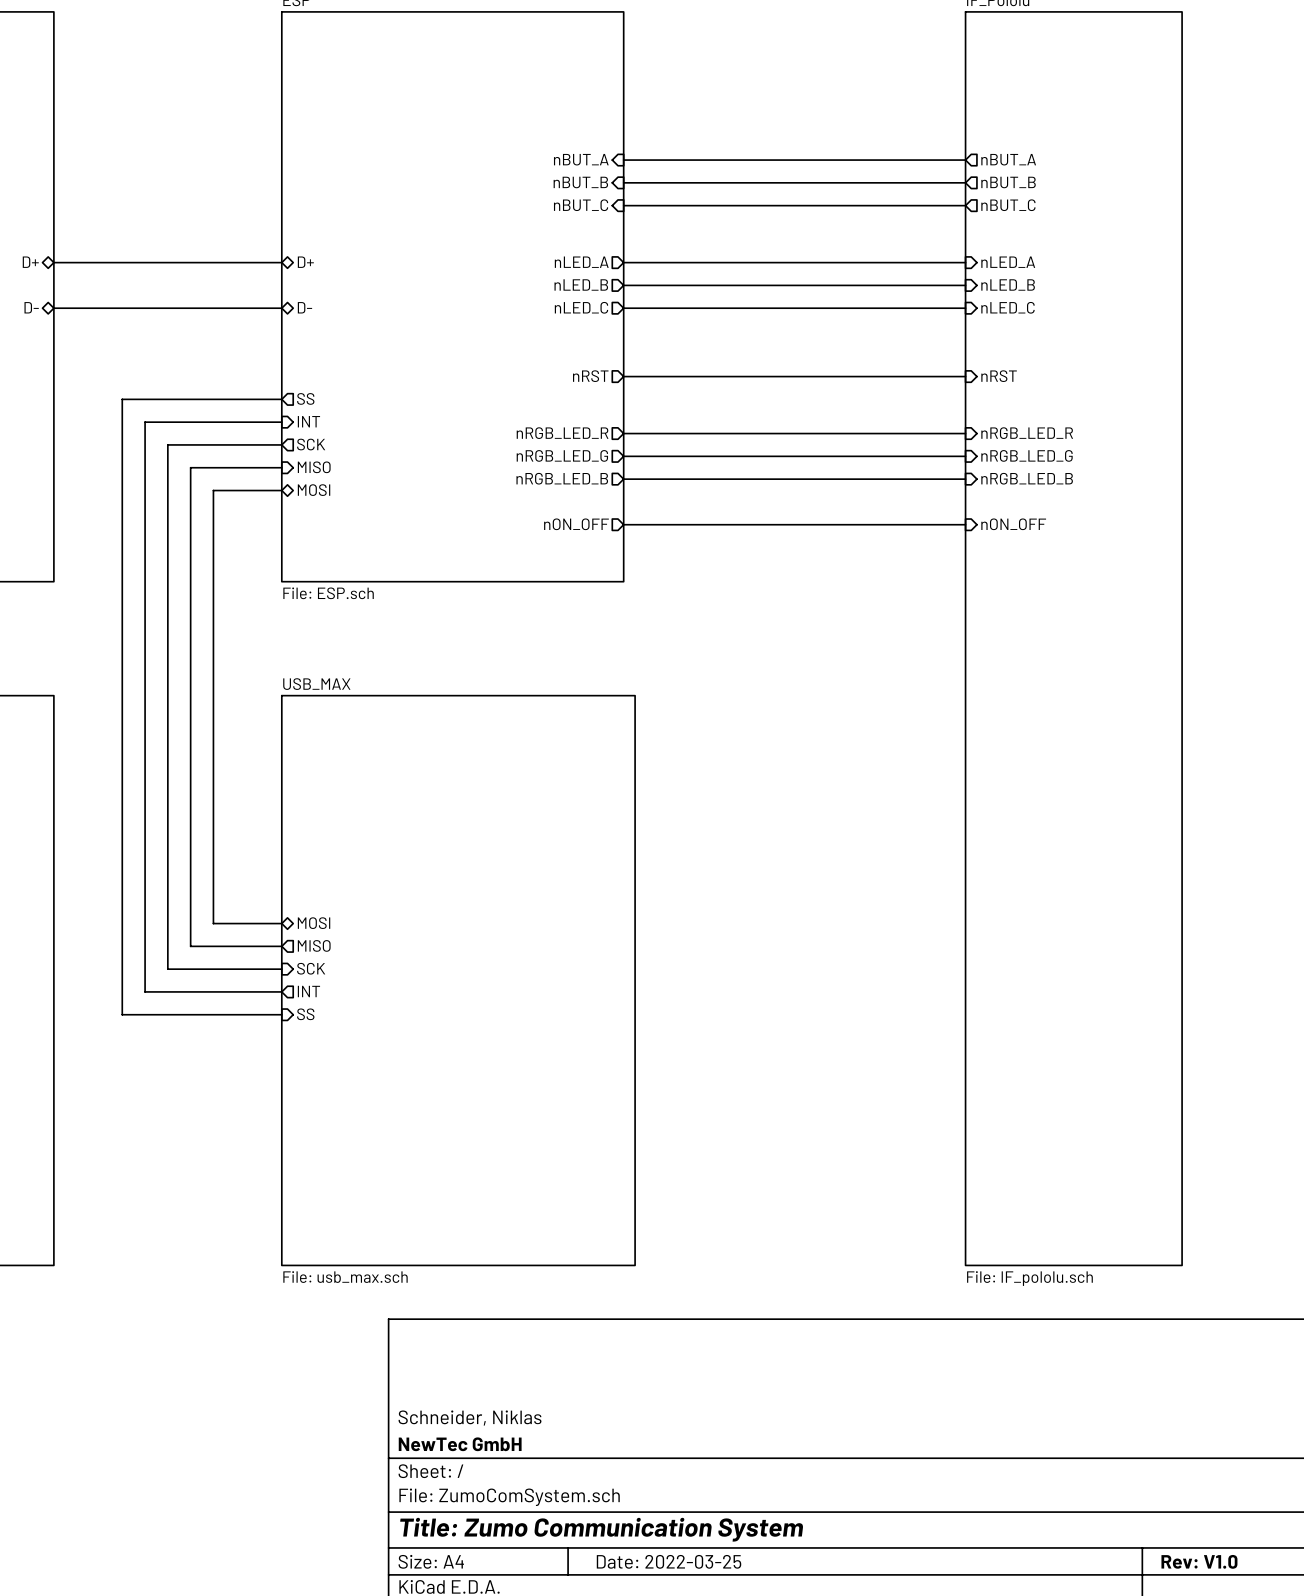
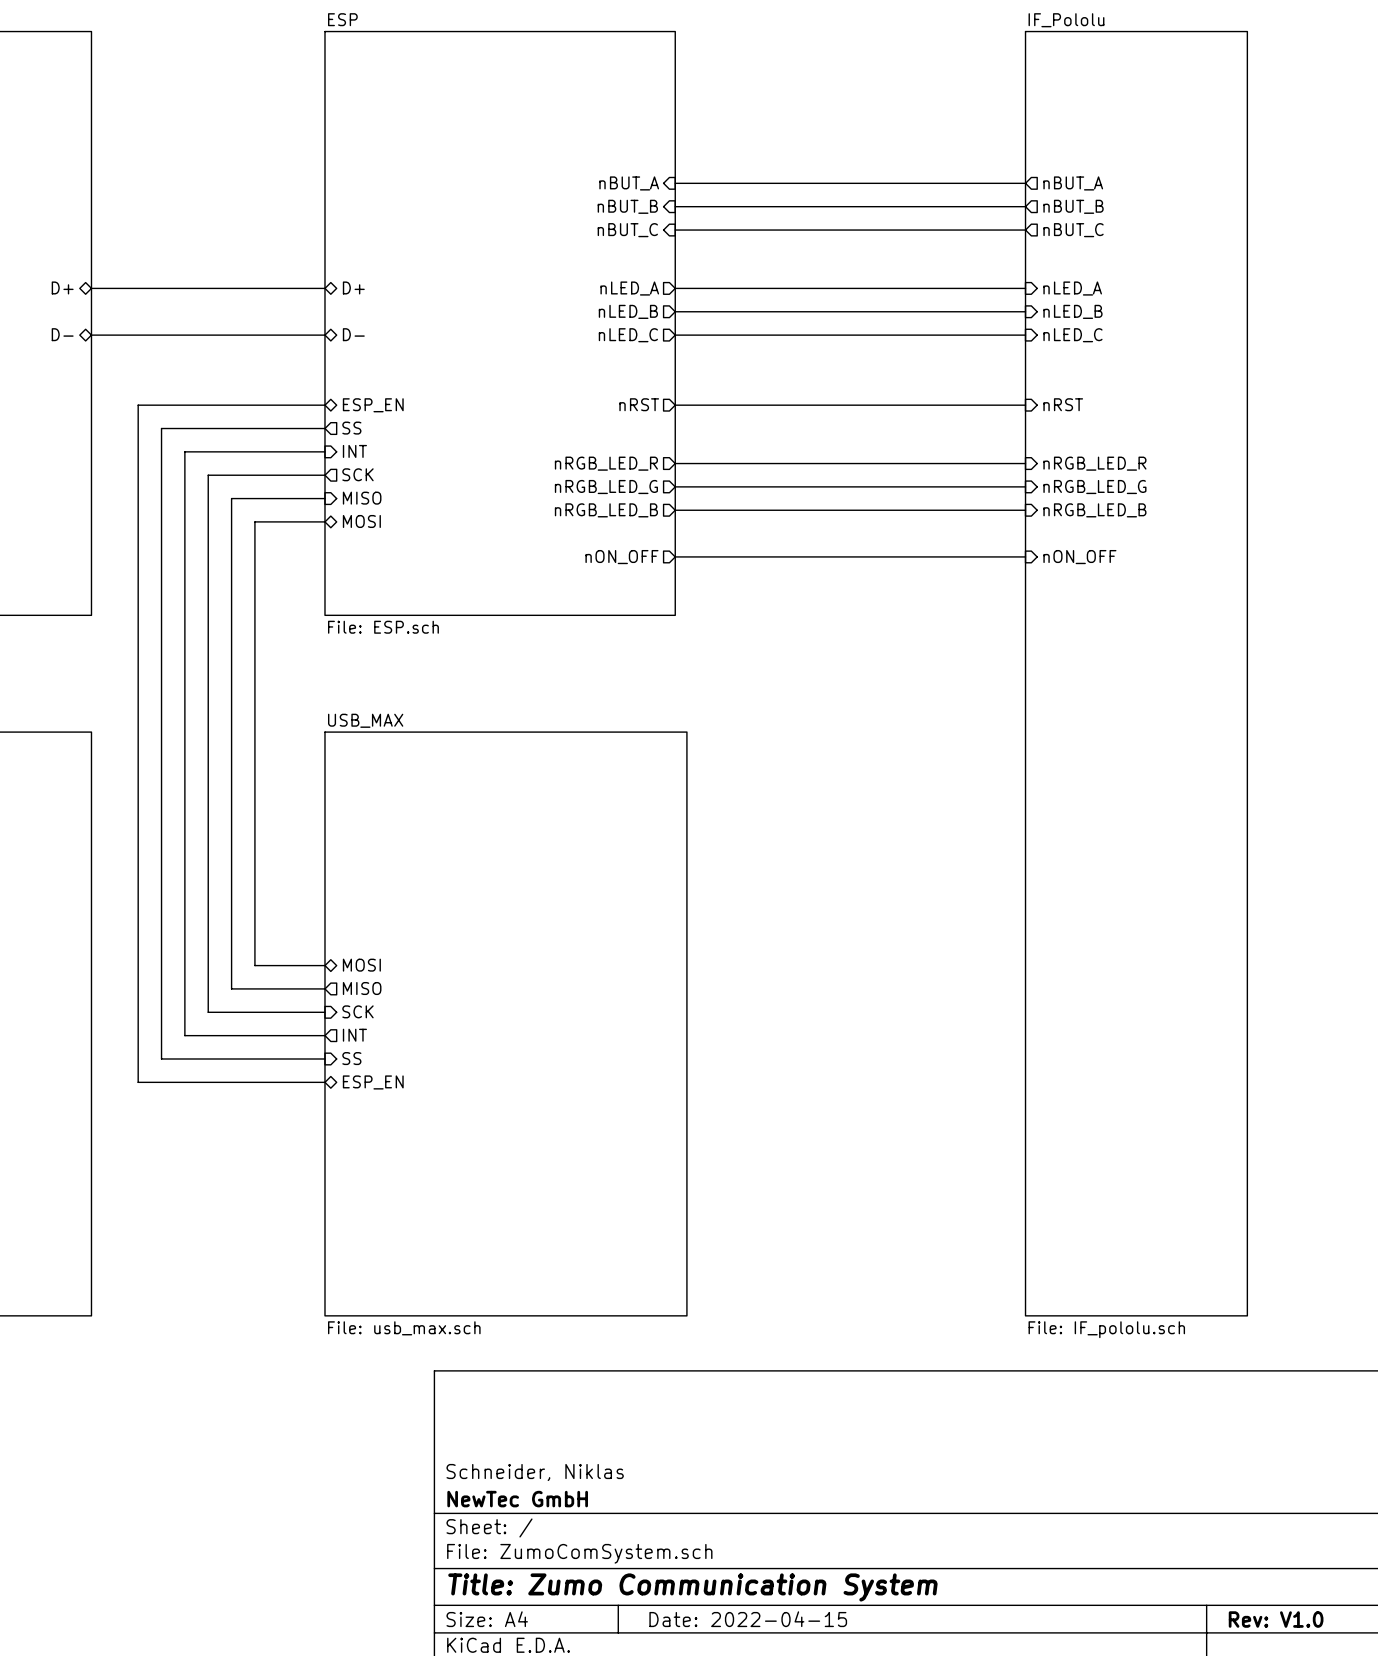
wire: none -> (324, 405) (138, 405) (138, 1082) (324, 1082)
sheet pin: none -> ESP_EN (373, 405)
sheet pin: none -> ESP_EN (373, 1082)
title block: Date: 2022-03-25 (669, 1561) -> Date: 2022-04-15 (748, 1619)

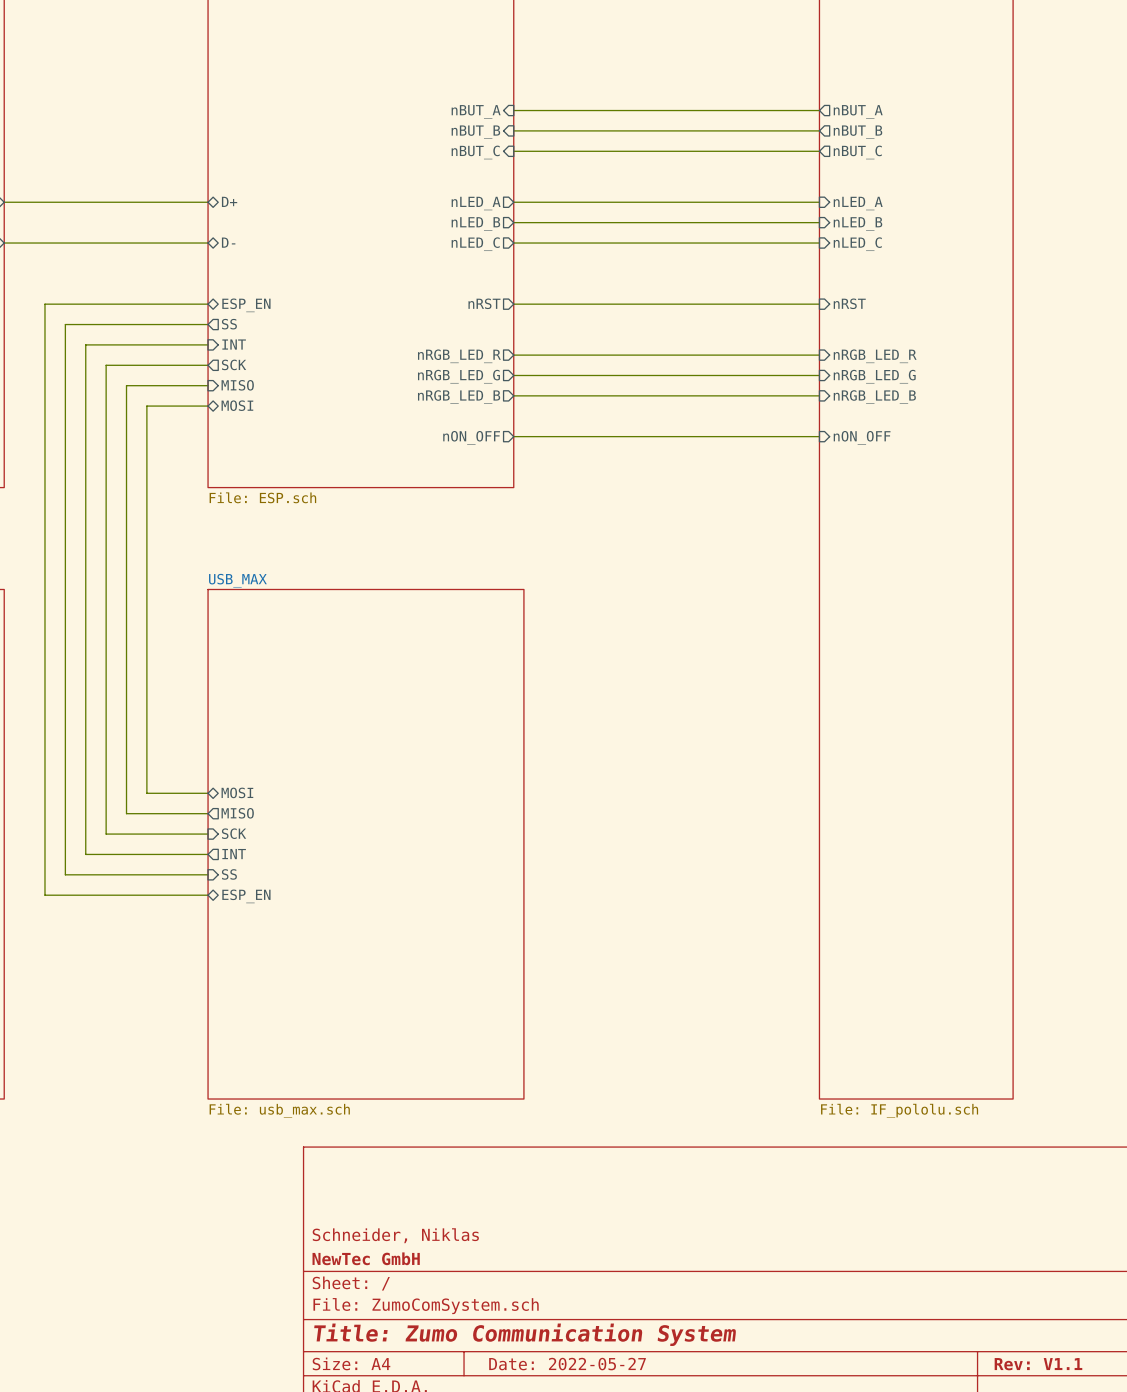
title block: Date: 2022-04-15 (748, 1619) -> Date: 2022-05-27 (567, 1364)
title block: Rev: V1.0 (1276, 1619) -> Rev: V1.1 (1038, 1364)

